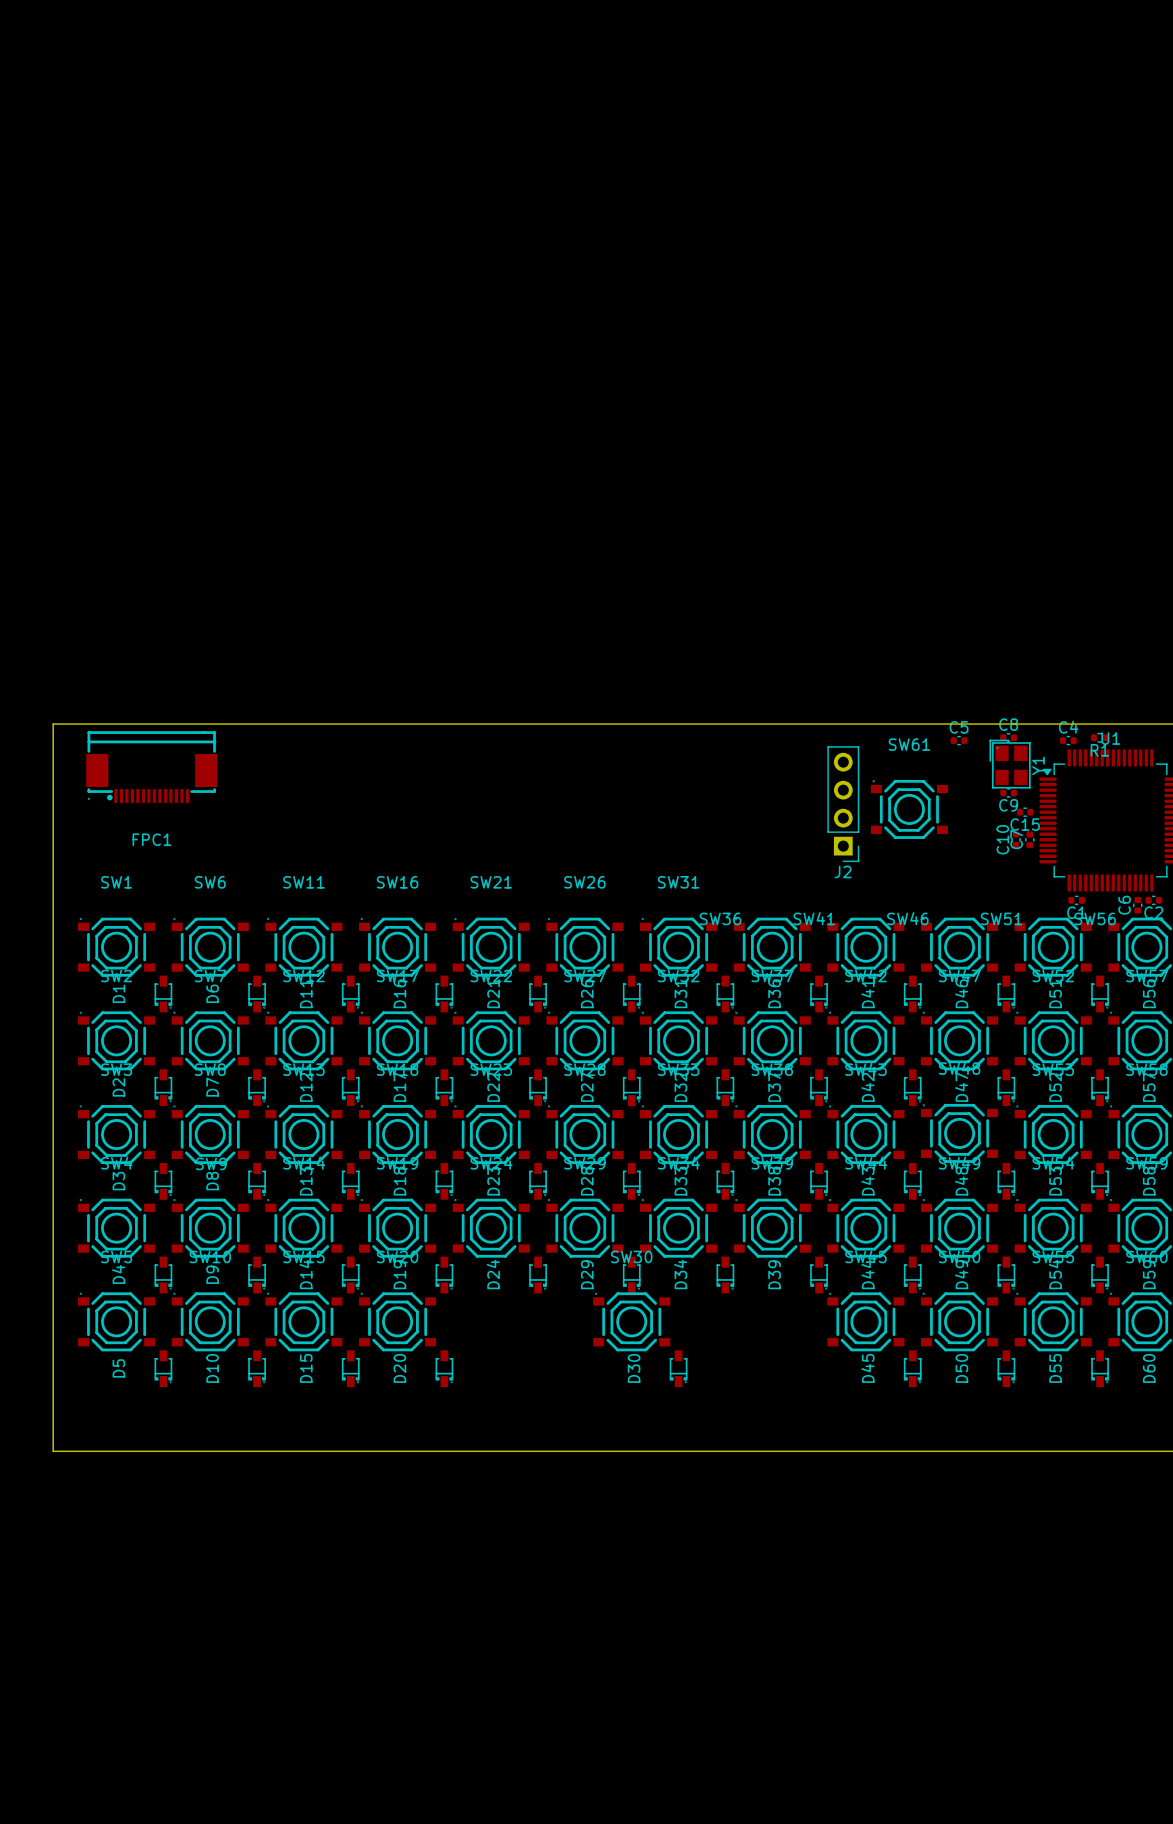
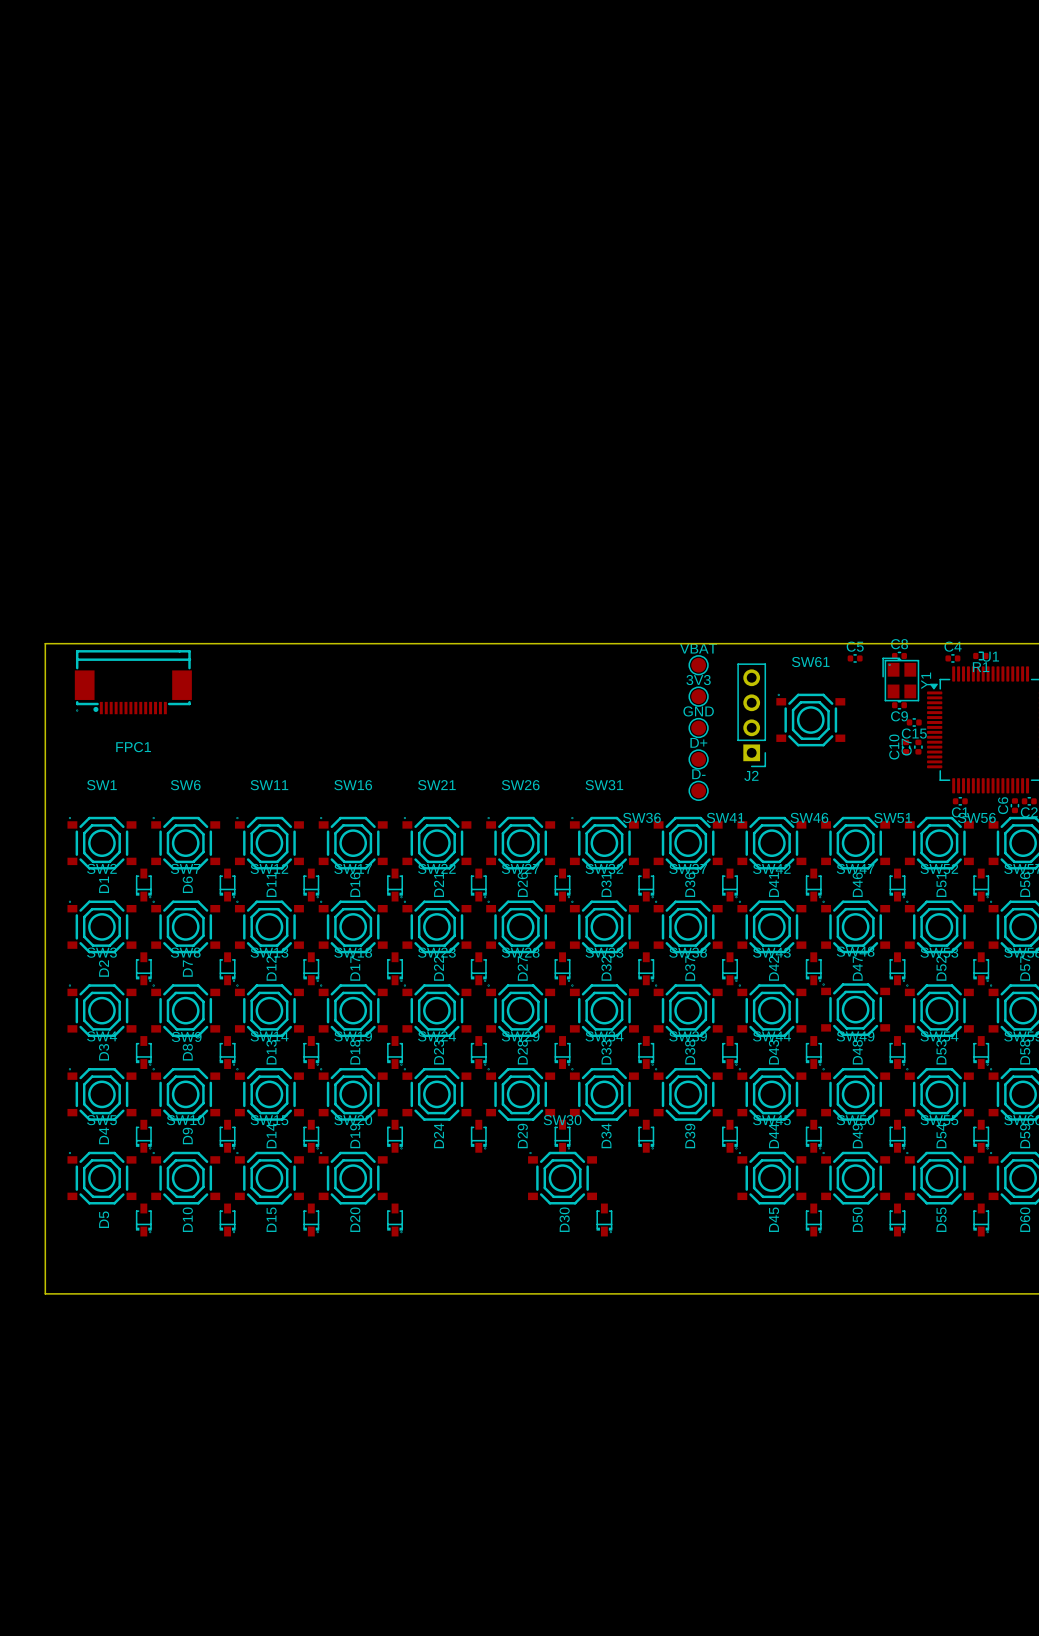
VBAT: none -> (698, 665)
3V3: none -> (698, 696)
GND: none -> (698, 728)
D+: none -> (698, 759)
D-: none -> (698, 790)

